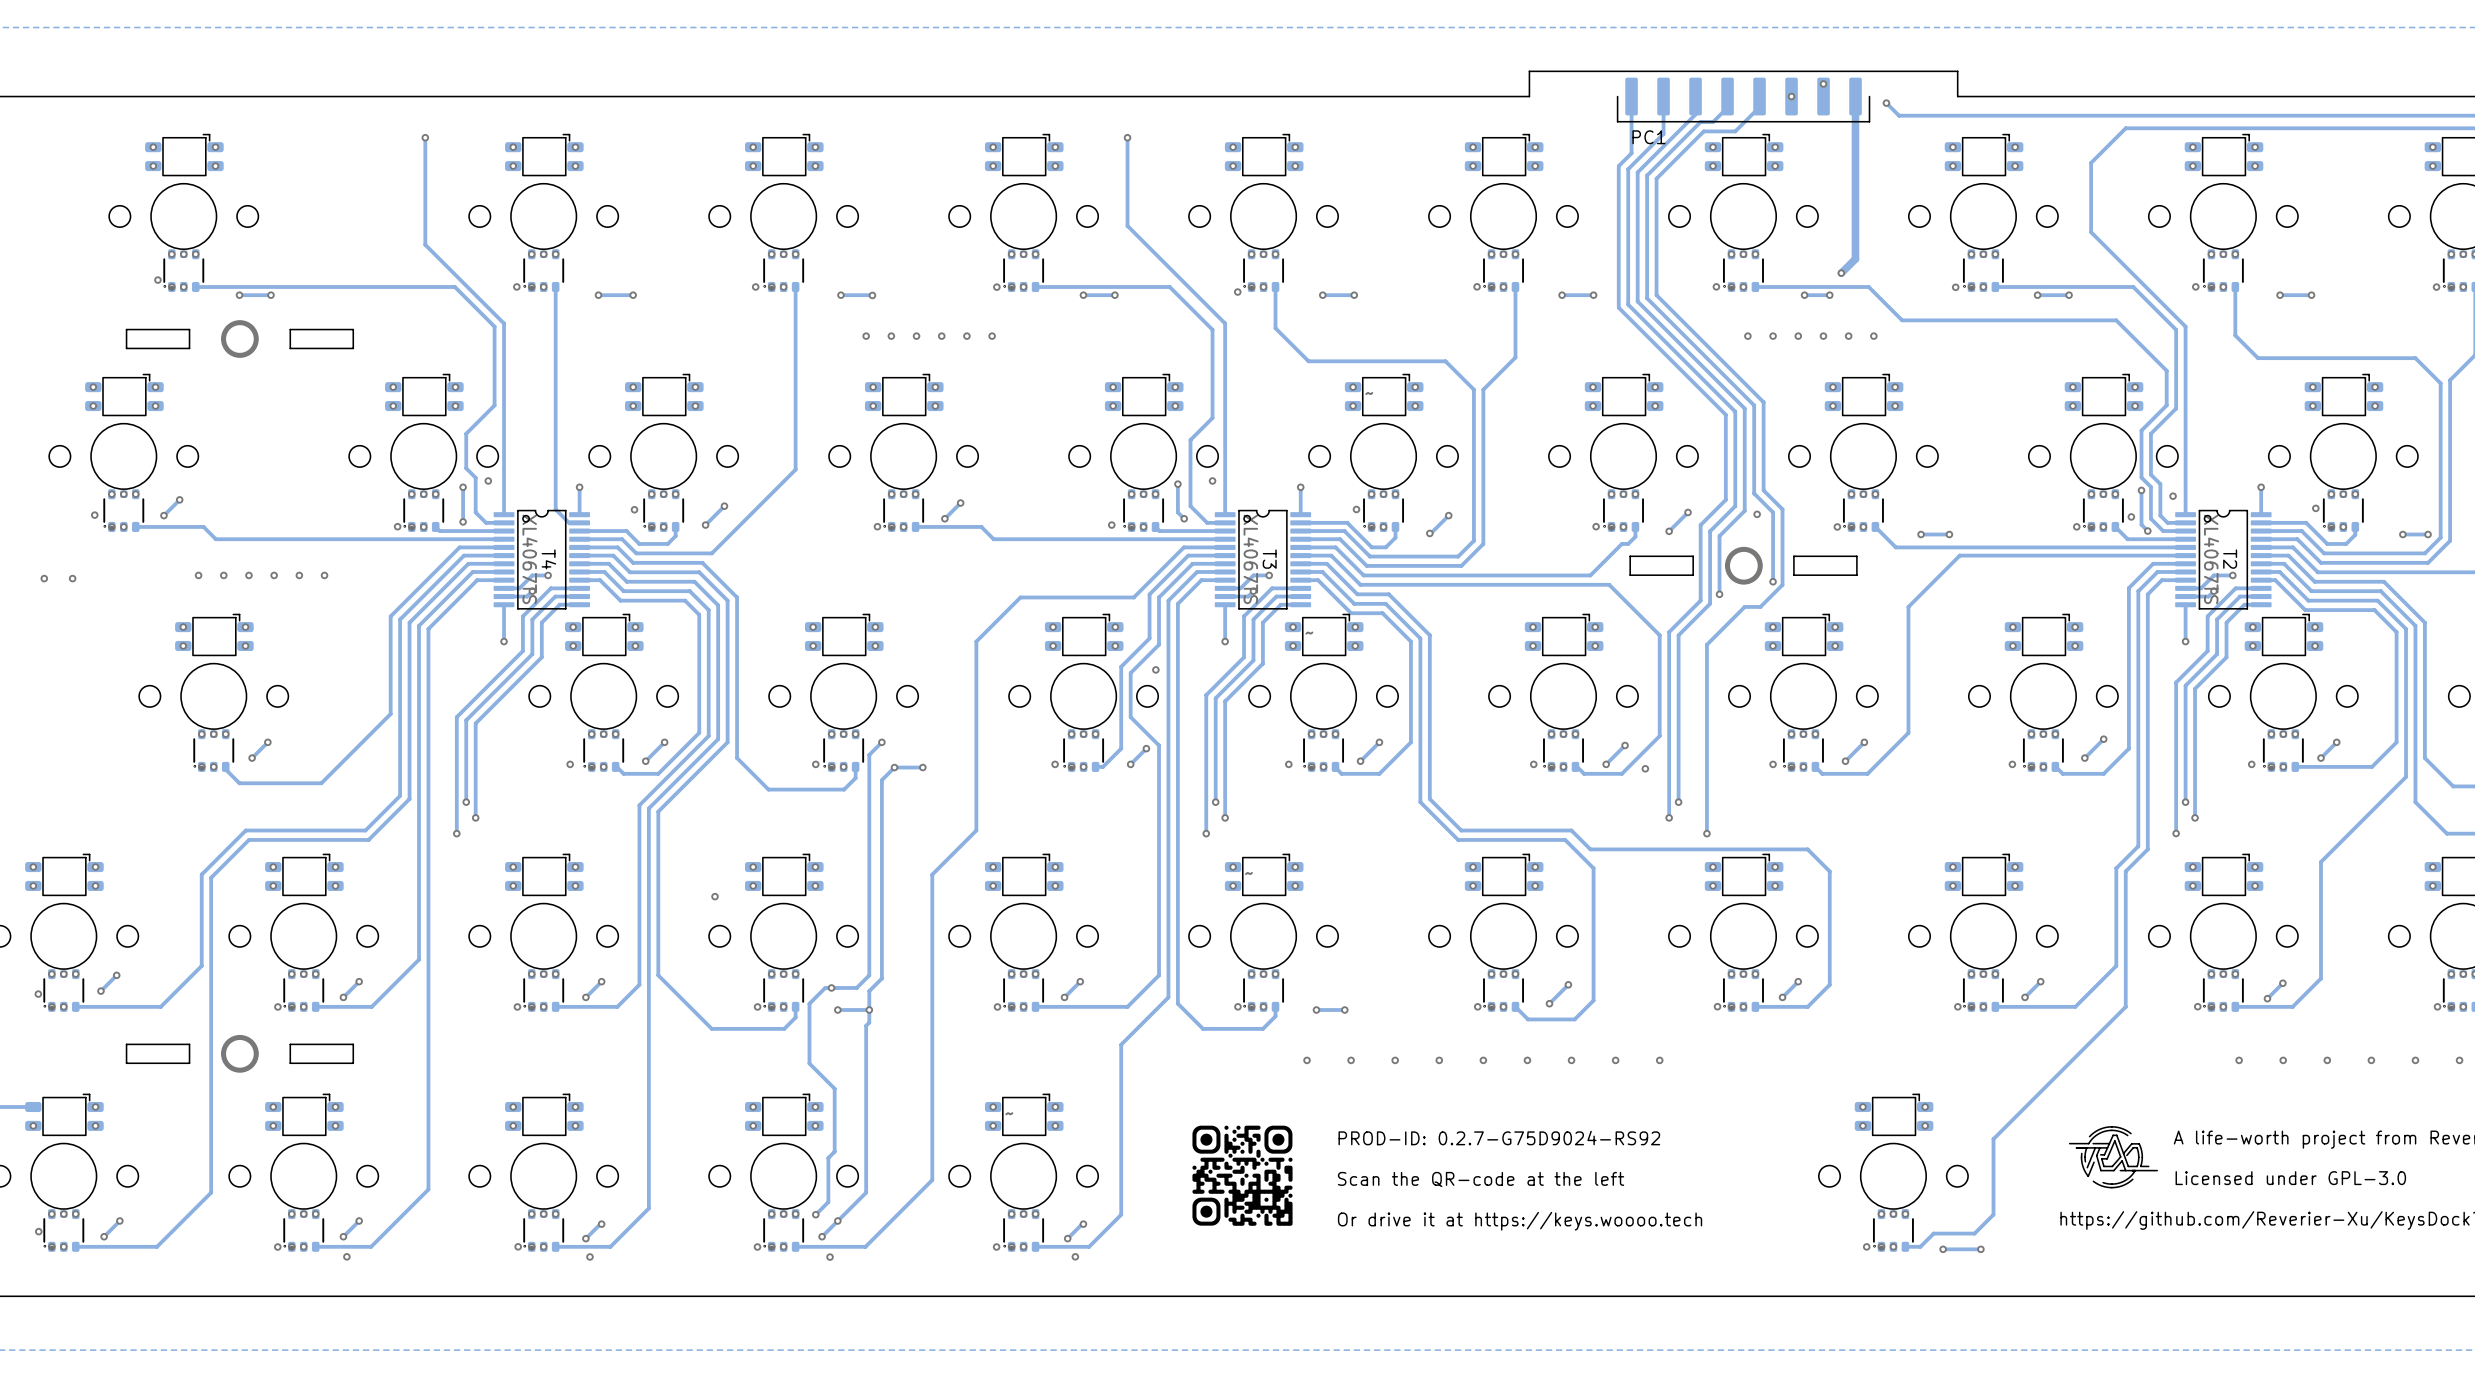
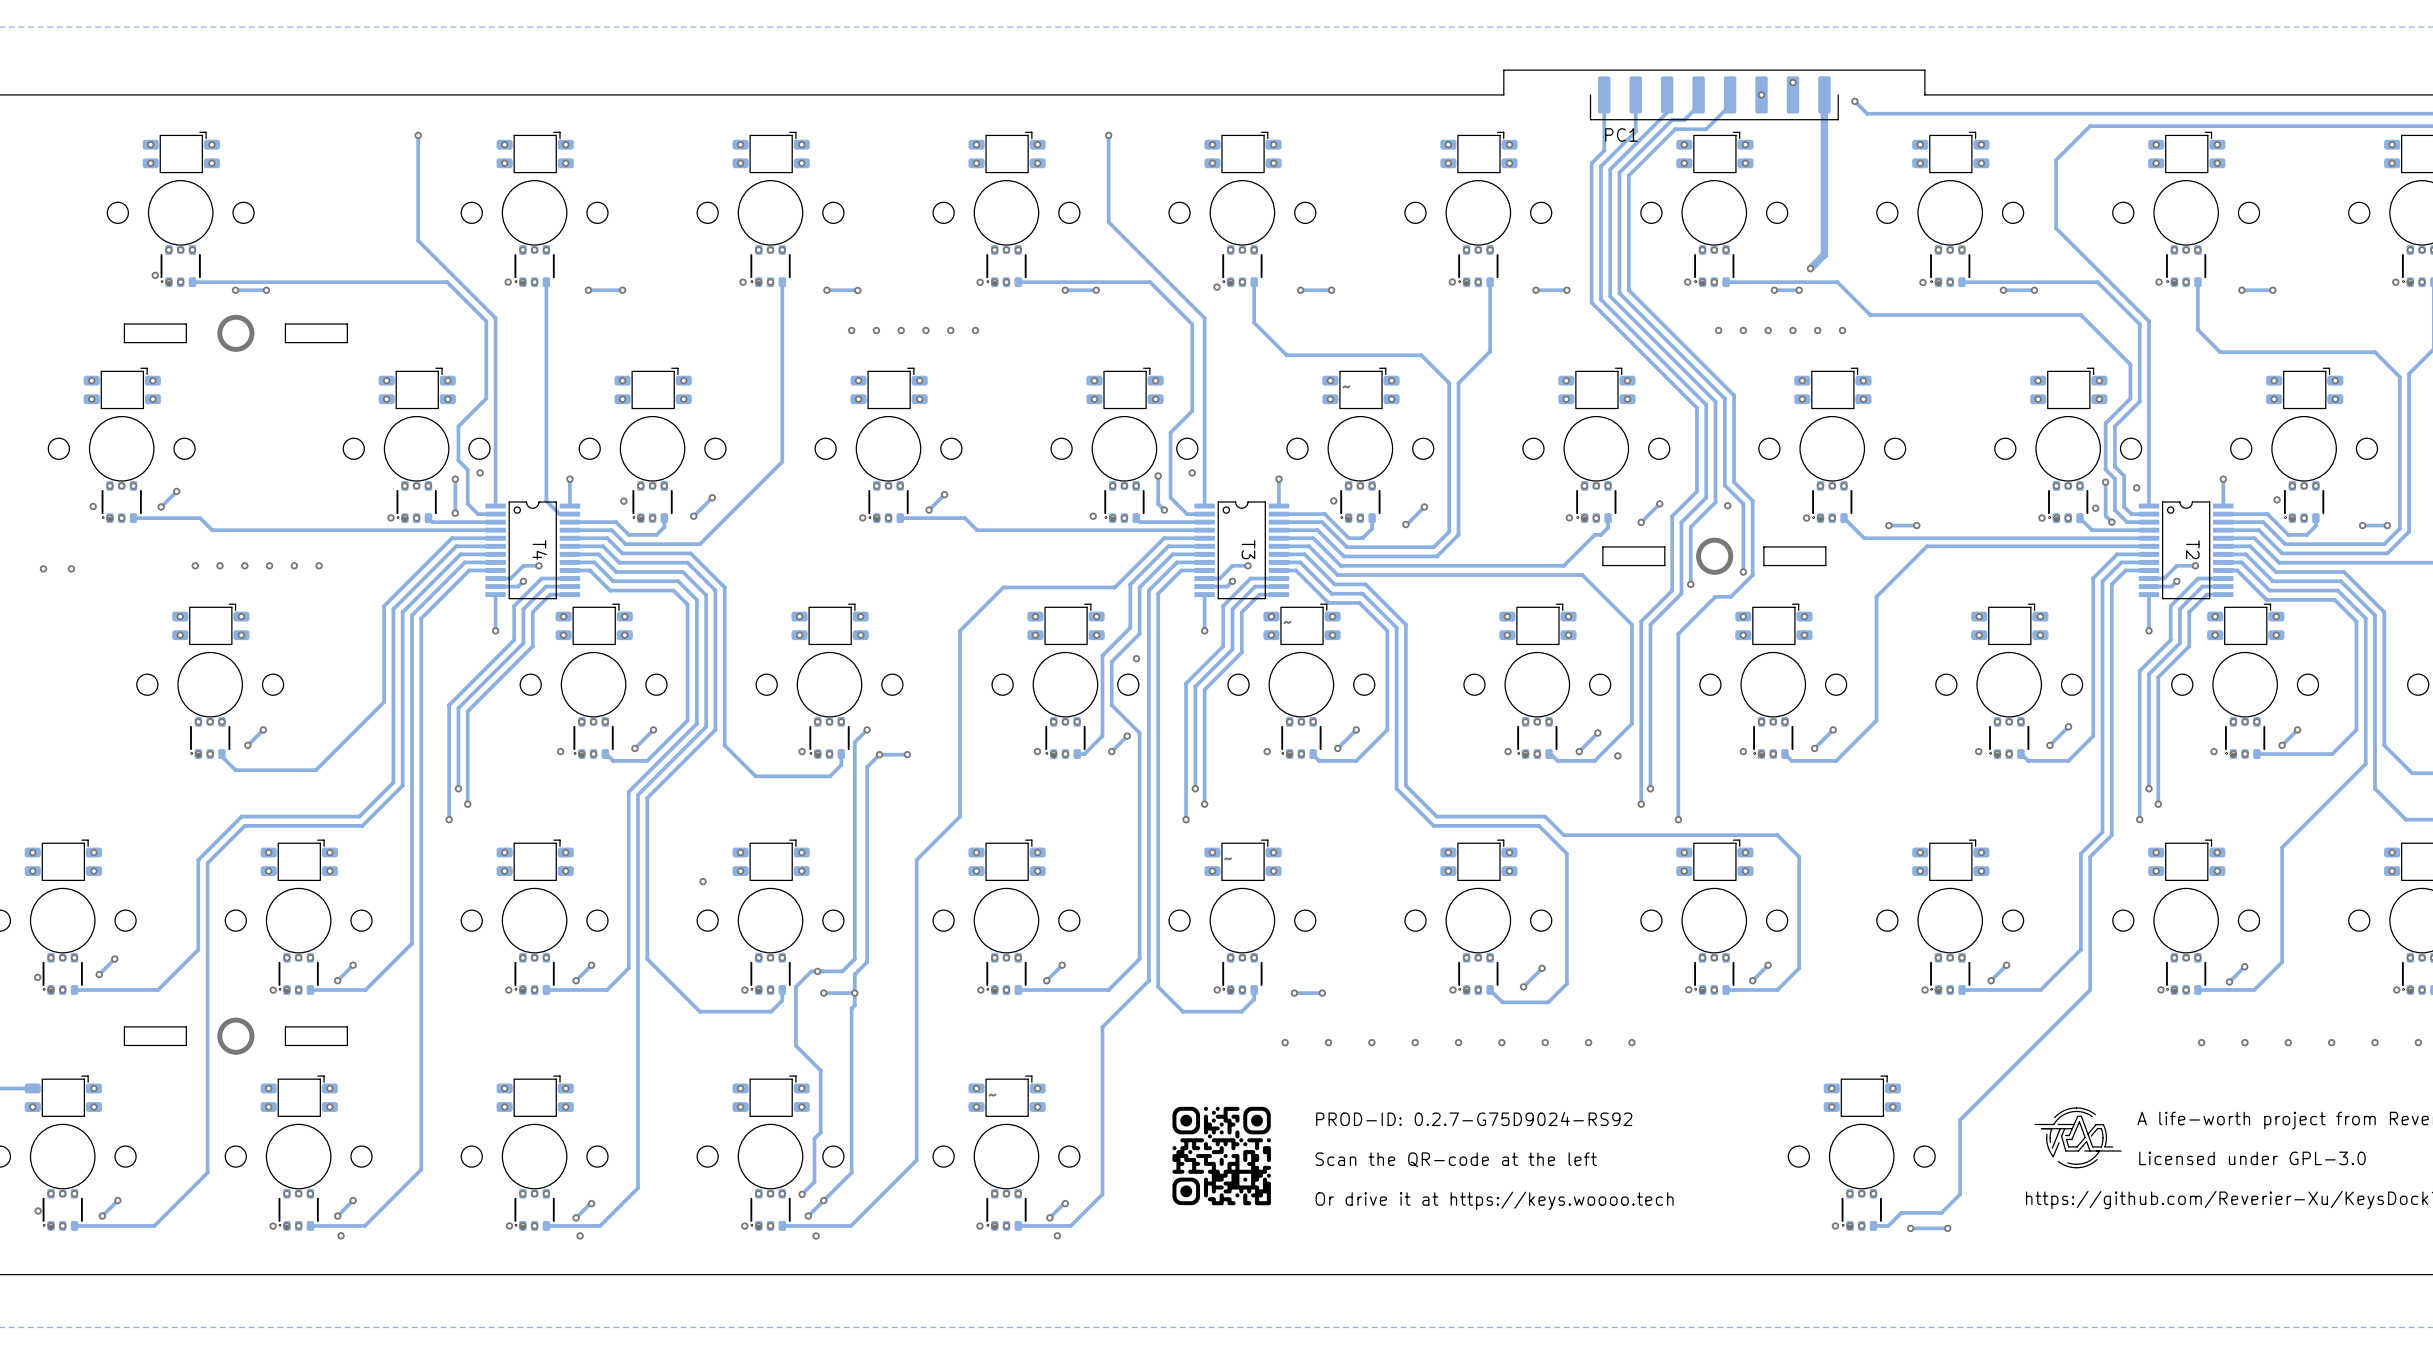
T4 value: XL4067TS (529, 559) -> none
T3 value: XL4067TS (1251, 559) -> none
T2 value: XL4067TS (2211, 559) -> none

